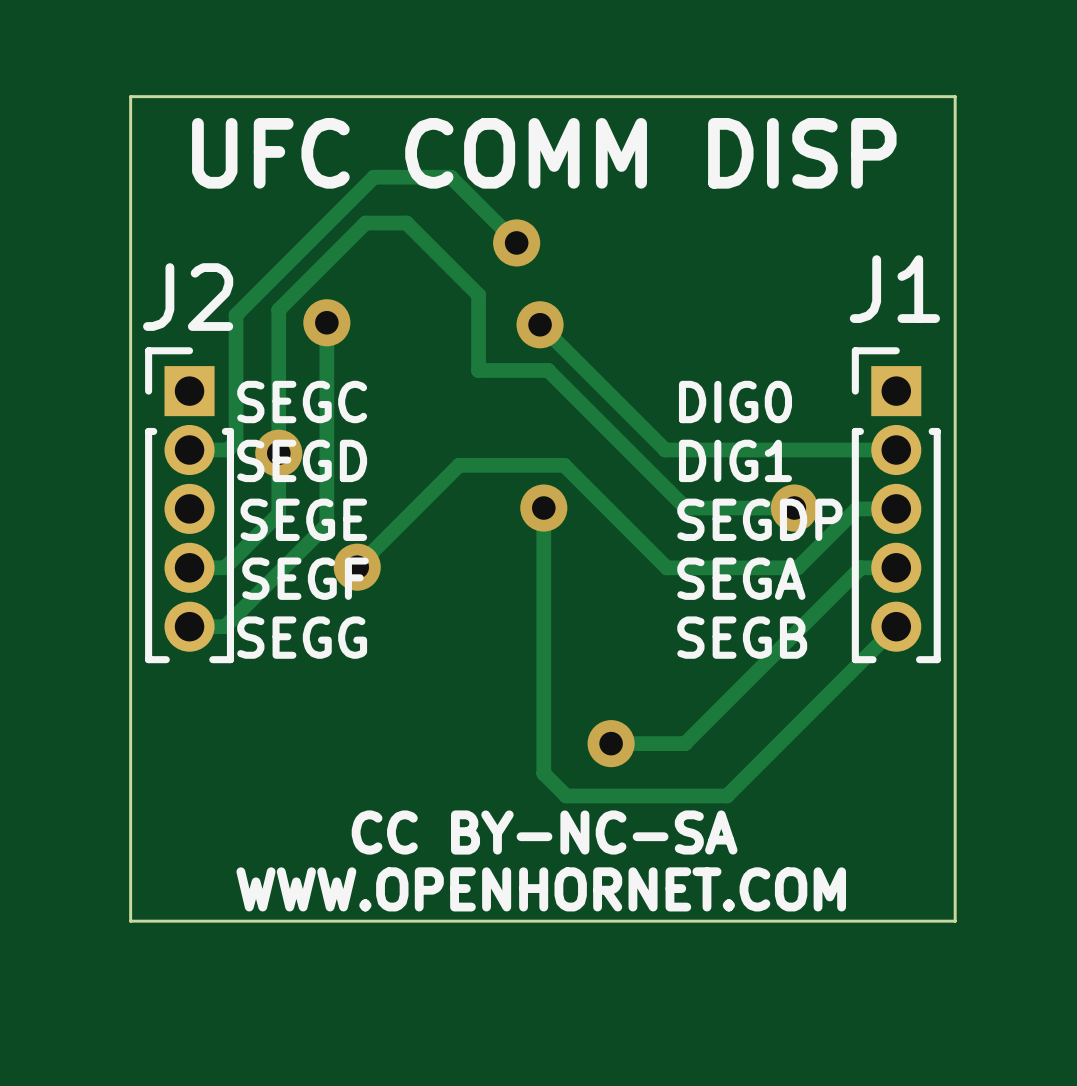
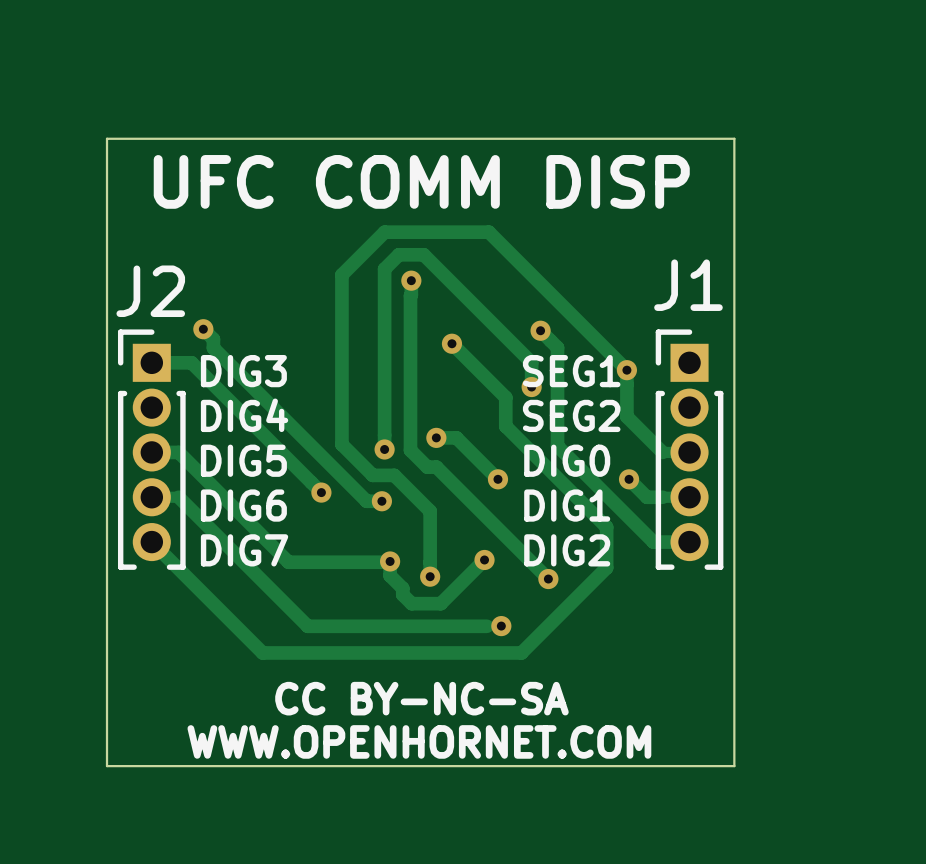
track: (516, 242) (450, 177) (373, 177) (236, 315) (236, 441) (227, 450) (189, 450) -> none
via: (516, 242) -> none
track: none -> (411, 280) (410, 450) (427, 467) (436, 467) (548, 579)
via: none -> (411, 280)
track: (326, 322) (326, 524) (224, 626) (189, 626) -> (451, 343) (505, 397) (505, 426) (606, 527) (606, 567) (521, 652) (262, 652) (151, 542)
via: (326, 322) -> none
track: (540, 324) (665, 450) (896, 450) -> none
via: (540, 324) -> none
track: none -> (203, 329) (213, 339) (213, 348) (366, 501) (381, 501)
via: none -> (203, 329)
via: none -> (540, 330)
via: none -> (451, 343)
track: none -> (151, 362) (191, 362) (321, 492)
via: none -> (626, 370)
text: SEGC (302, 402) -> DIG3 (243, 371)
text: DIG0 (735, 402) -> SEG1 (571, 371)
track: none -> (531, 387) (531, 362) (423, 254) (398, 254) (384, 269) (384, 449)
via: none -> (531, 387)
via: (278, 453) -> none
text: SEGD (302, 460) -> DIG4 (244, 415)
text: DIG1 (735, 460) -> SEG2 (571, 415)
via size: [520, 484, 568, 532] -> [426, 427, 447, 448]
track: none -> (436, 437) (456, 437) (497, 479)
via: none -> (384, 449)
track: none -> (151, 452) (178, 452) (288, 562) (392, 562)
track: (543, 508) (543, 773) (566, 795) (726, 795) (896, 626) -> (540, 330) (557, 347) (557, 446) (653, 542) (689, 542)
track: (794, 508) (685, 508) (548, 370) (478, 370) (478, 295) (406, 223) (365, 223) (278, 309) (278, 513) (224, 567) -> (486, 626) (307, 626) (178, 497)
via position: (794, 508) -> (629, 479)
track: (860, 508) (856, 508) (797, 567) (666, 567) (564, 465) (459, 465) (357, 567) -> (662, 452) (626, 416) (626, 370) (488, 232) (384, 232) (341, 274) (341, 444) (372, 475) (394, 475) (430, 511) (430, 576)
text: SEGE (303, 519) -> DIG5 (243, 460)
text: SEGDP (759, 519) -> DIG0 (567, 460)
via: none -> (497, 479)
via: none -> (321, 492)
via: (357, 567) -> none
track: (860, 567) (685, 743) (611, 743) -> (662, 497) (646, 497) (629, 479)
via: none -> (381, 501)
text: SEGF (305, 578) -> DIG6 (243, 505)
text: SEGA (741, 578) -> DIG1 (567, 505)
text: SEGG (302, 637) -> DIG7 (244, 550)
text: SEGB (742, 637) -> DIG2 (567, 550)
track: none -> (484, 559) (440, 603) (411, 603) (402, 594) (402, 588) (390, 575) (390, 561)
via: none -> (484, 559)
via: none -> (390, 561)
via: none -> (430, 576)
via: none -> (548, 579)
via: none -> (501, 626)
via: (611, 743) -> none

